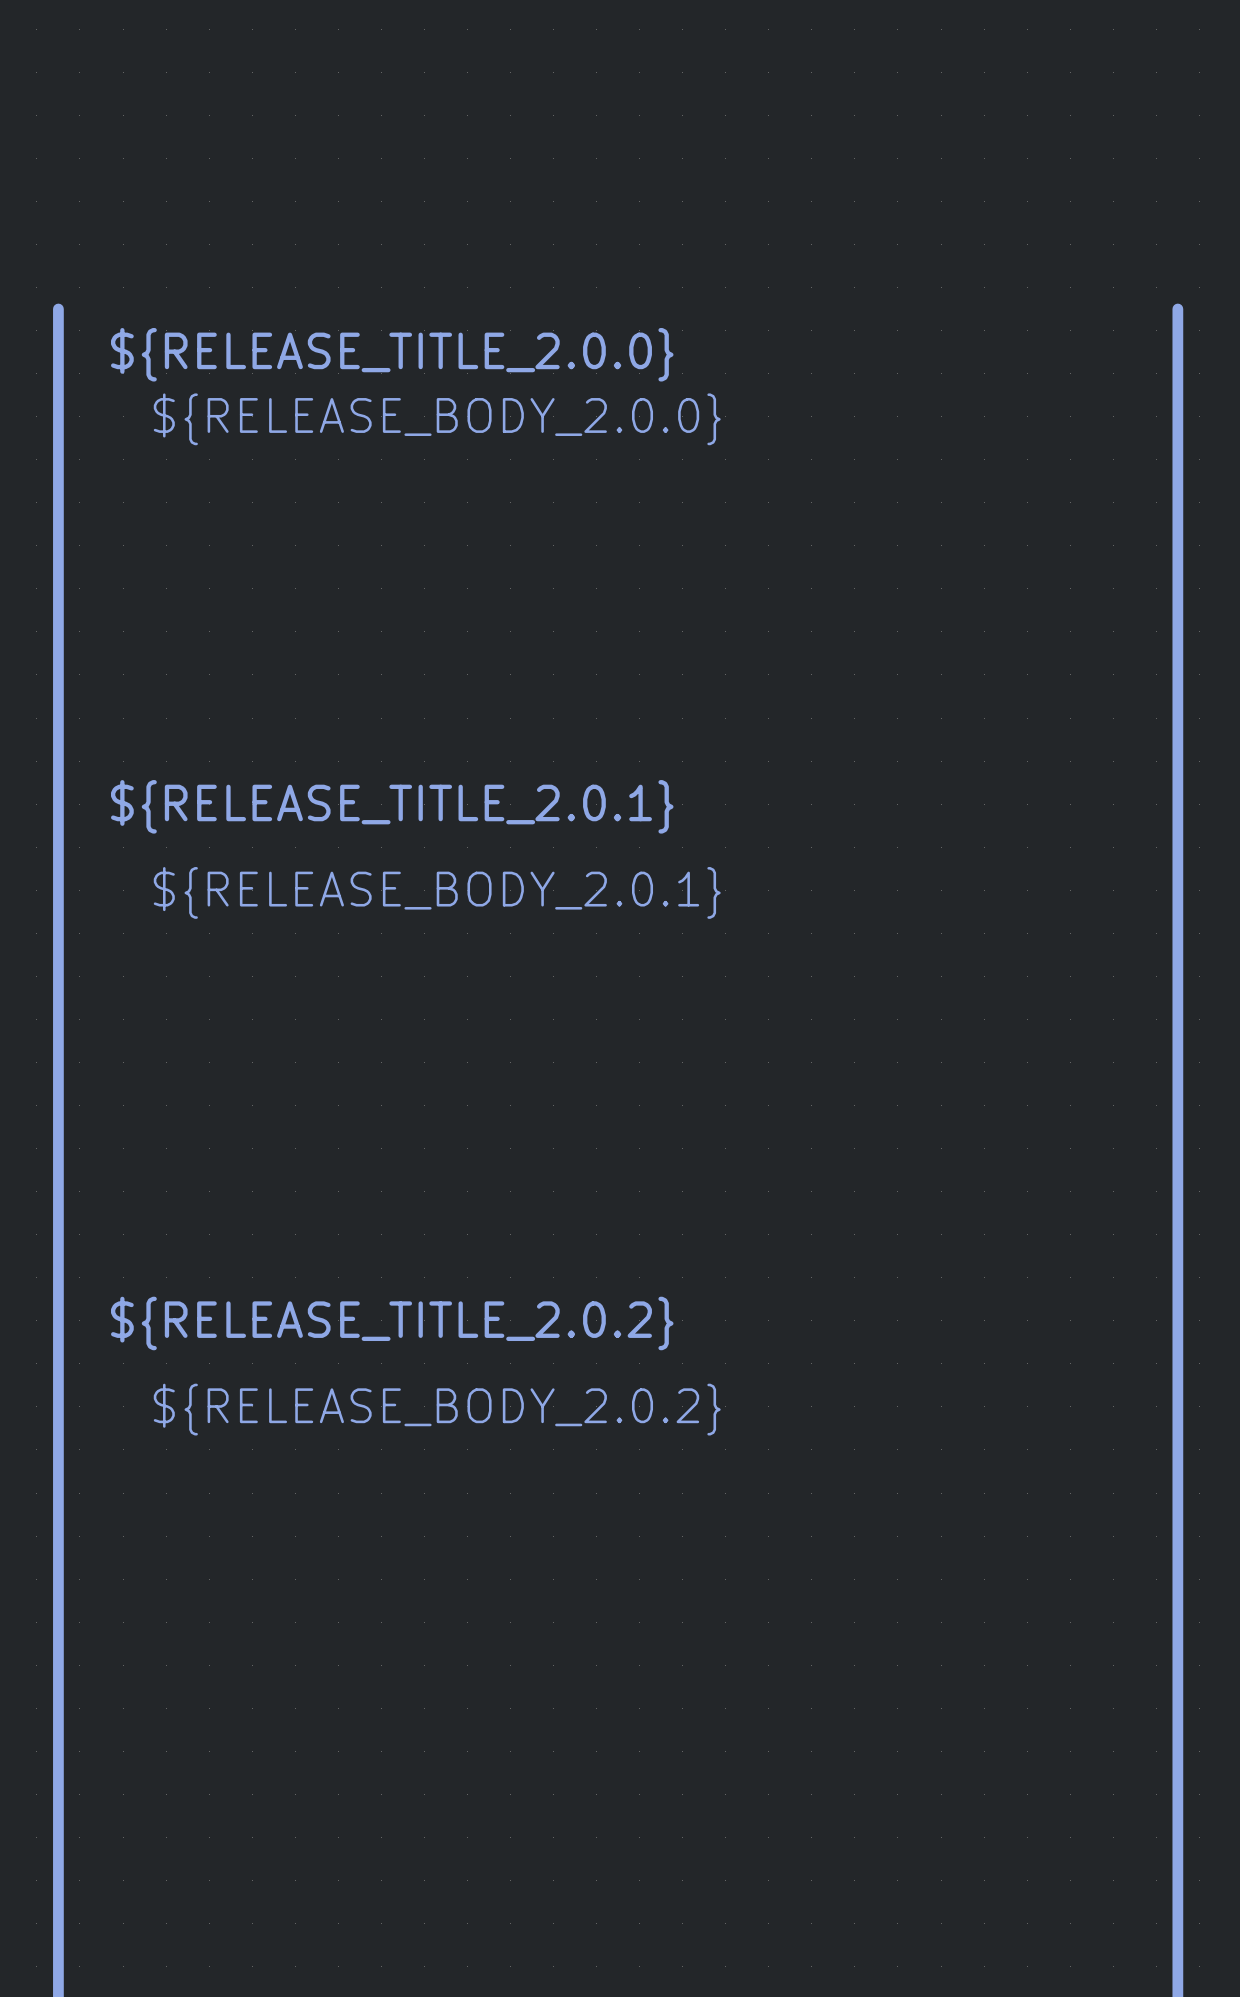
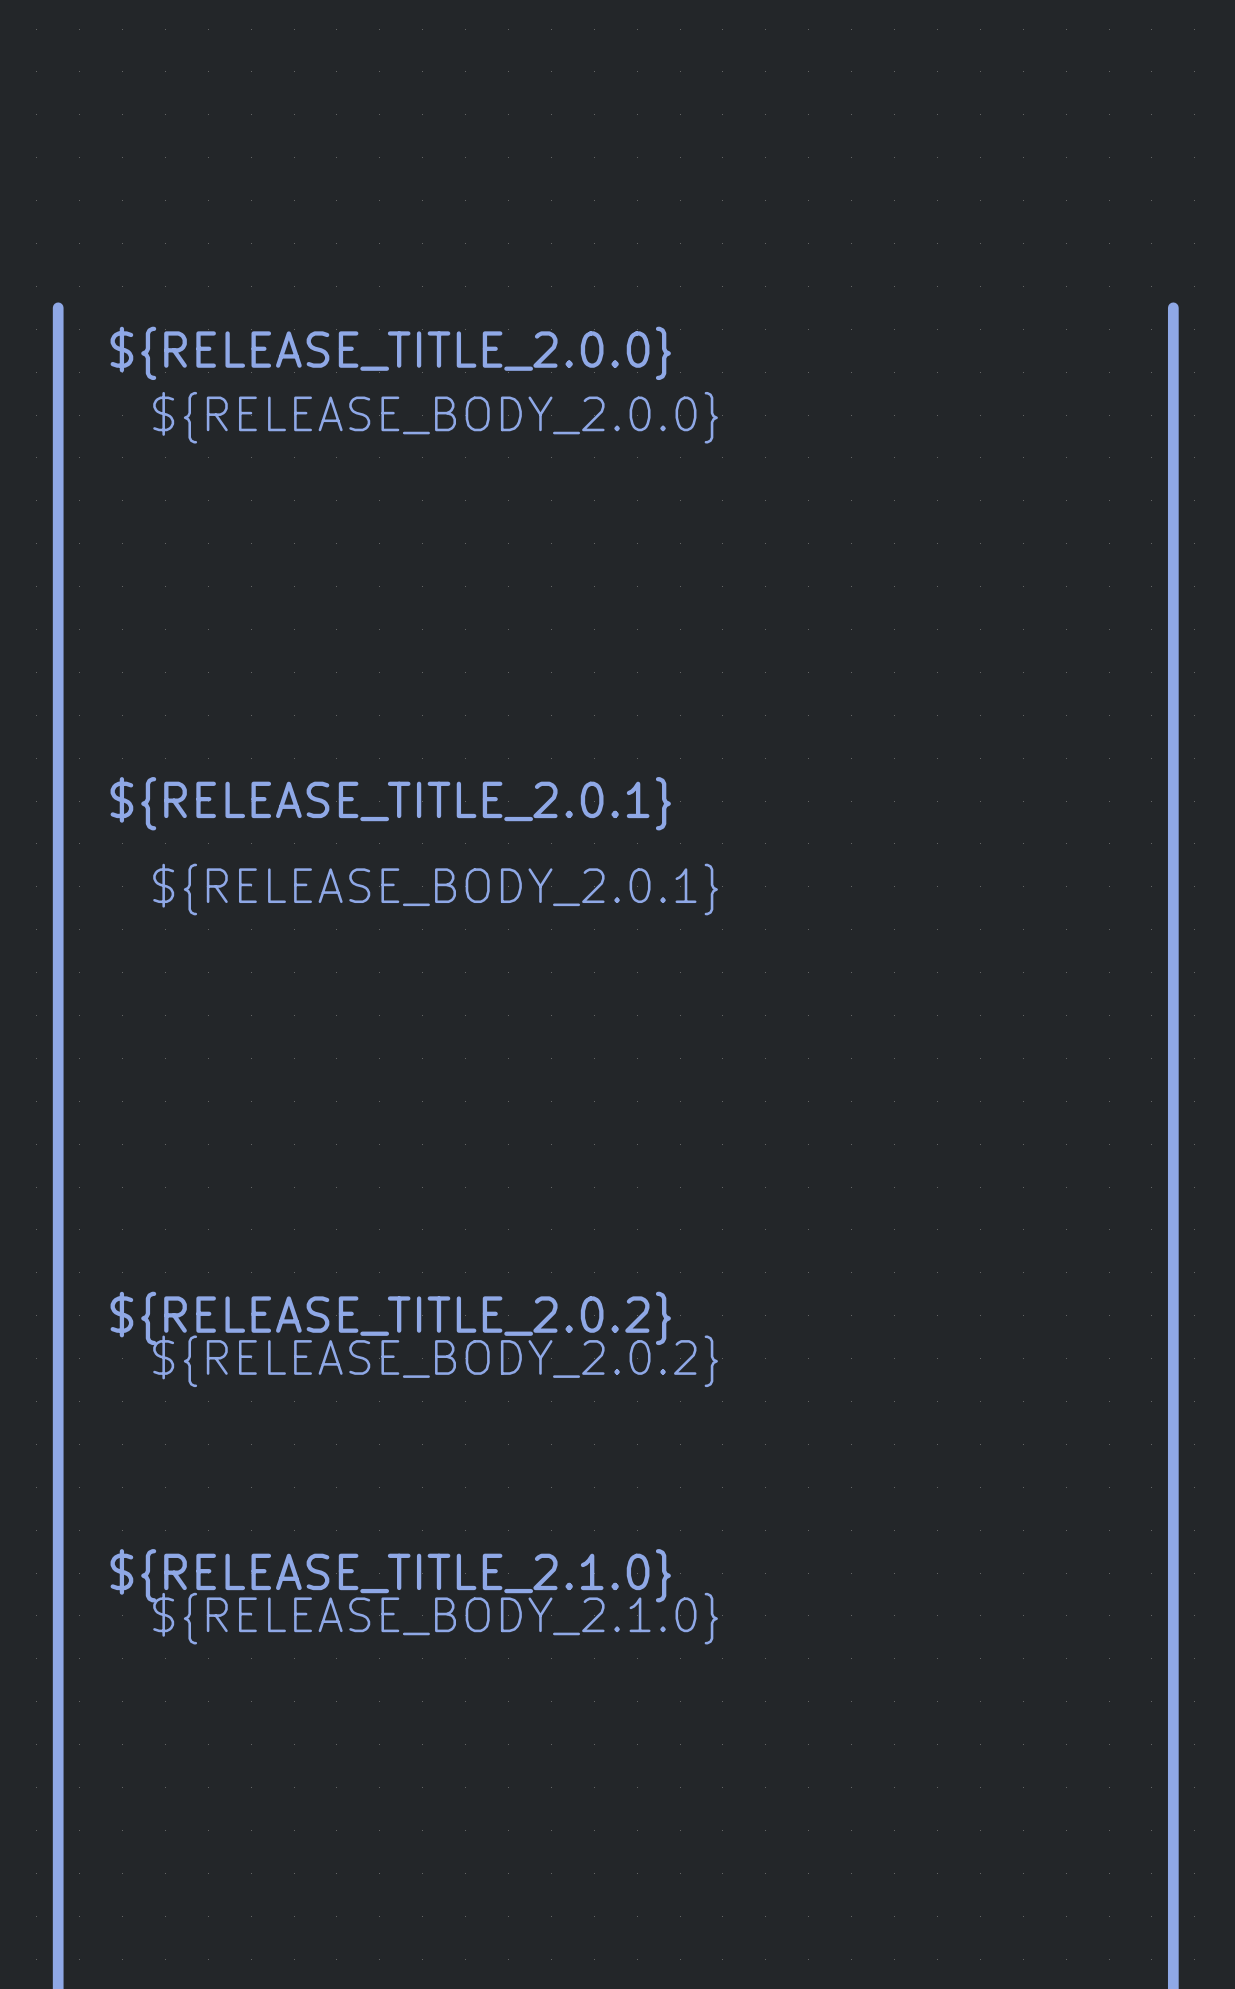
text position: ${RELEASE_BODY_2.0.2} (437, 1409) -> ${RELEASE_BODY_2.0.2} (435, 1361)
text: none -> ${RELEASE_TITLE_2.1.0} (390, 1575)
text: none -> ${RELEASE_BODY_2.1.0} (435, 1618)

